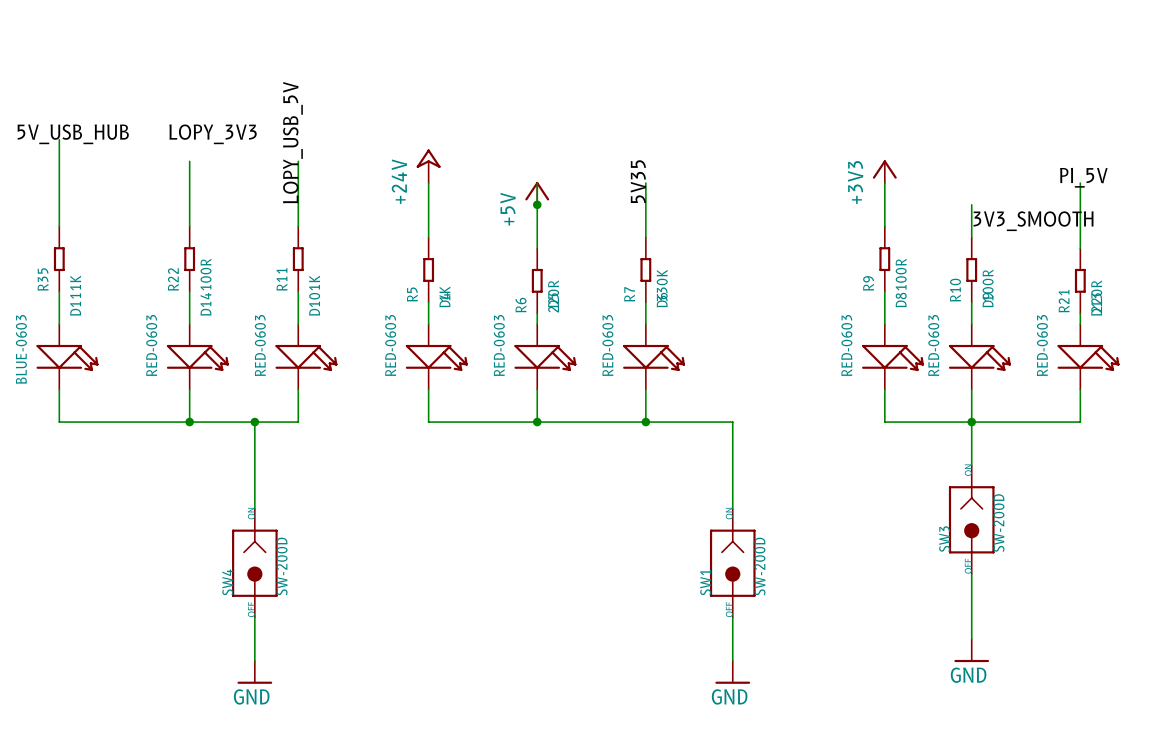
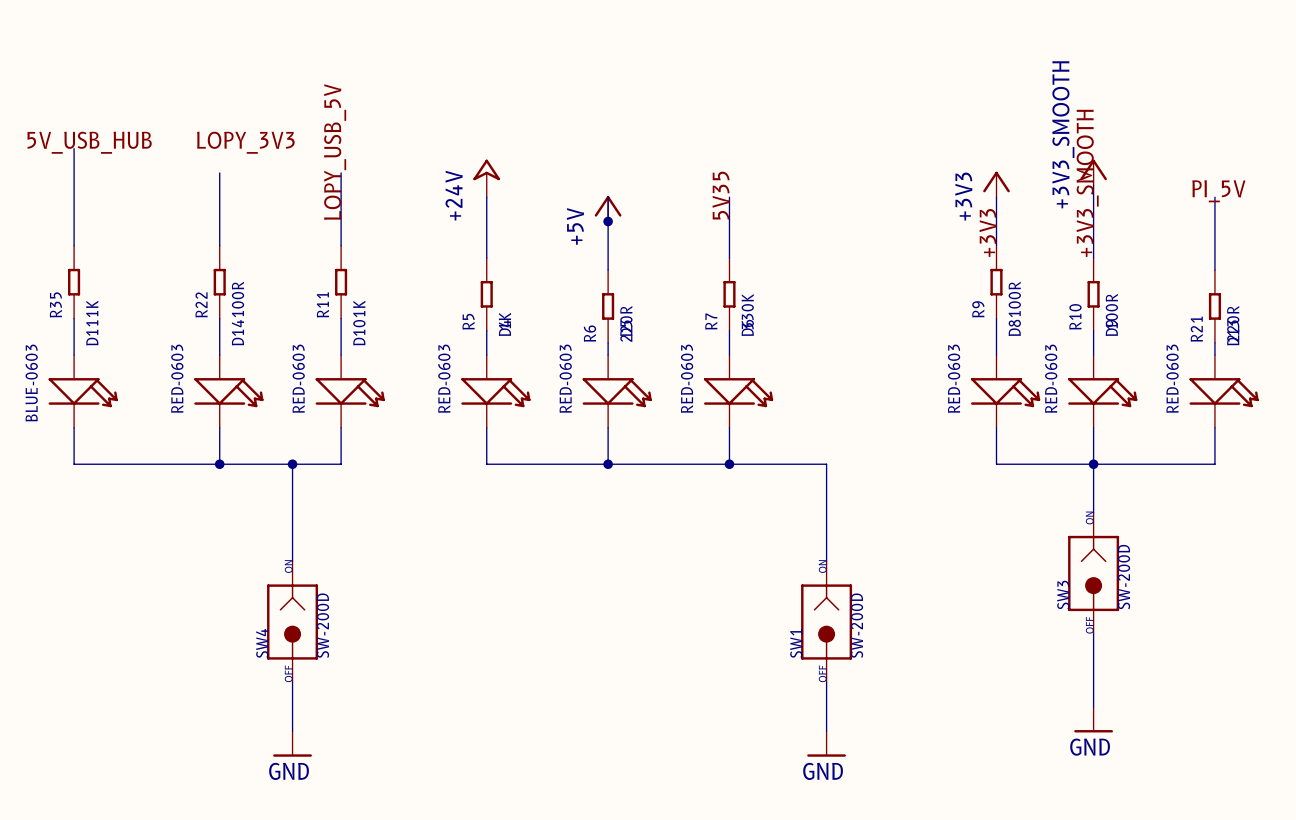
power symbol: none -> +3V3_SMOOTH (1093, 172)
wire: none -> (1093, 185) (1093, 221)
label: none -> +3V3 (988, 232)
label: 3V3_SMOOTH (1033, 221) -> +3V3_SMOOTH (1087, 183)

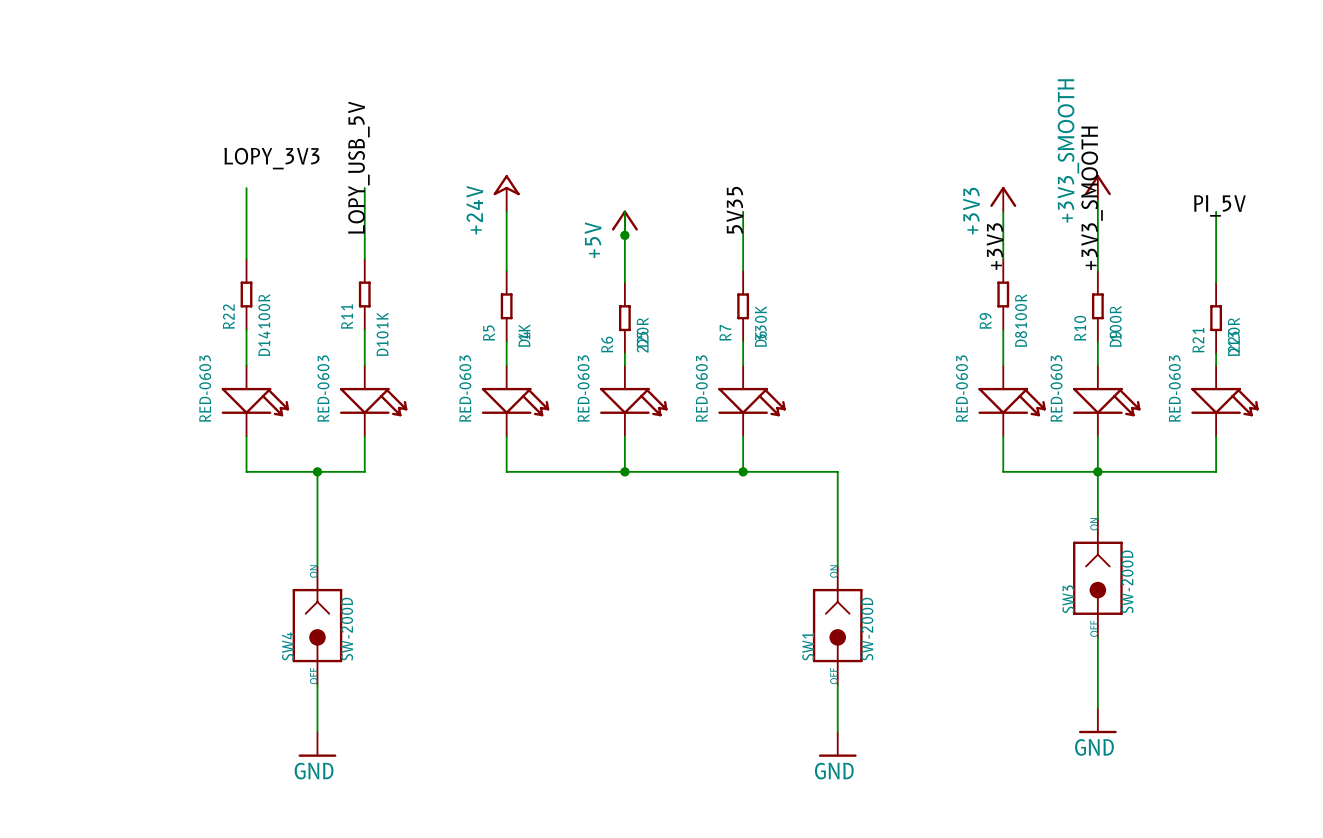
label: 5V_USB_HUB (89, 142) -> none
wire: (74, 148) (74, 245) -> none
R35: 1K (74, 282) -> none
wire: (74, 318) (74, 355) -> none
D11: BLUE-0603 (83, 391) -> none
wire: (74, 427) (74, 464) (219, 464) -> none
junction: (219, 464) -> none

